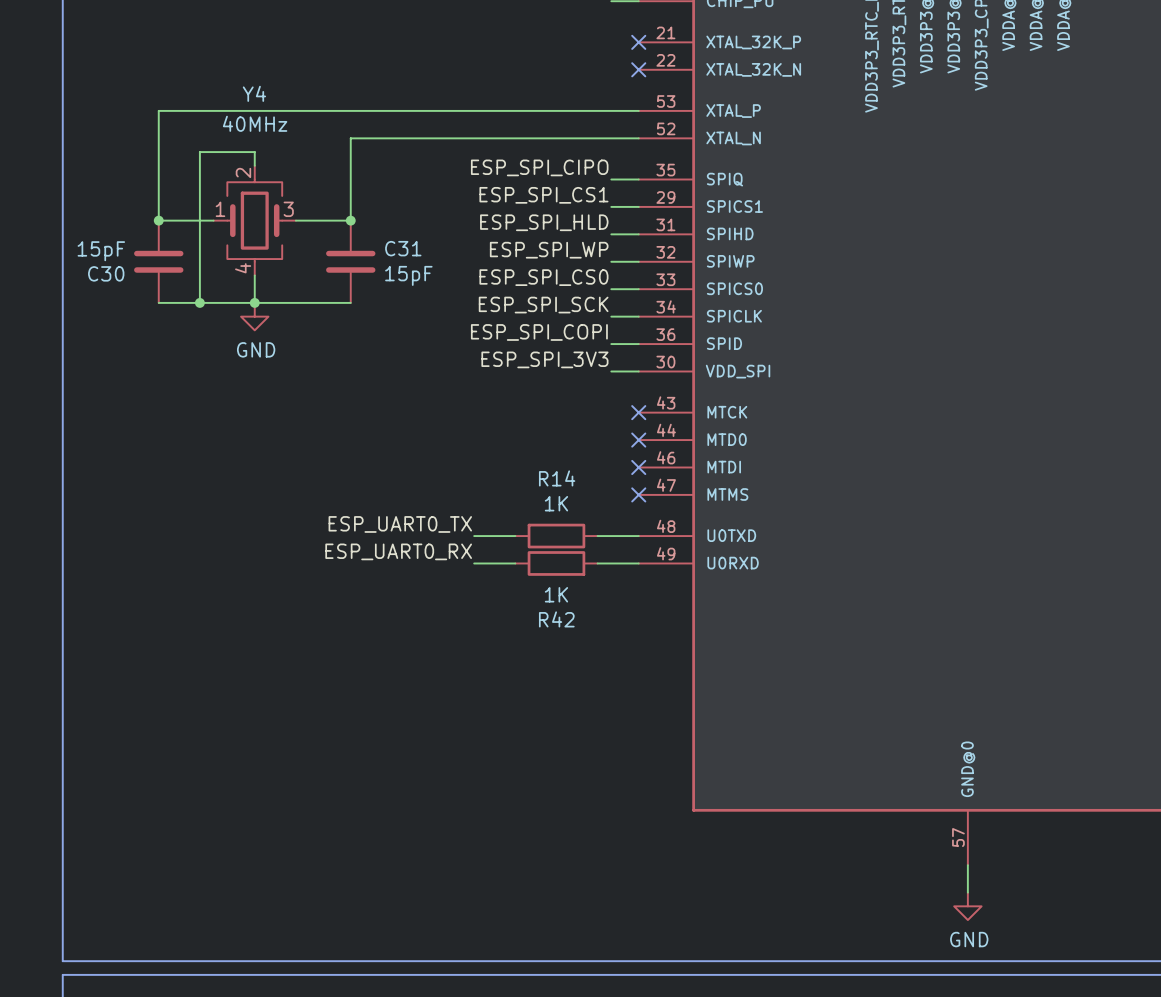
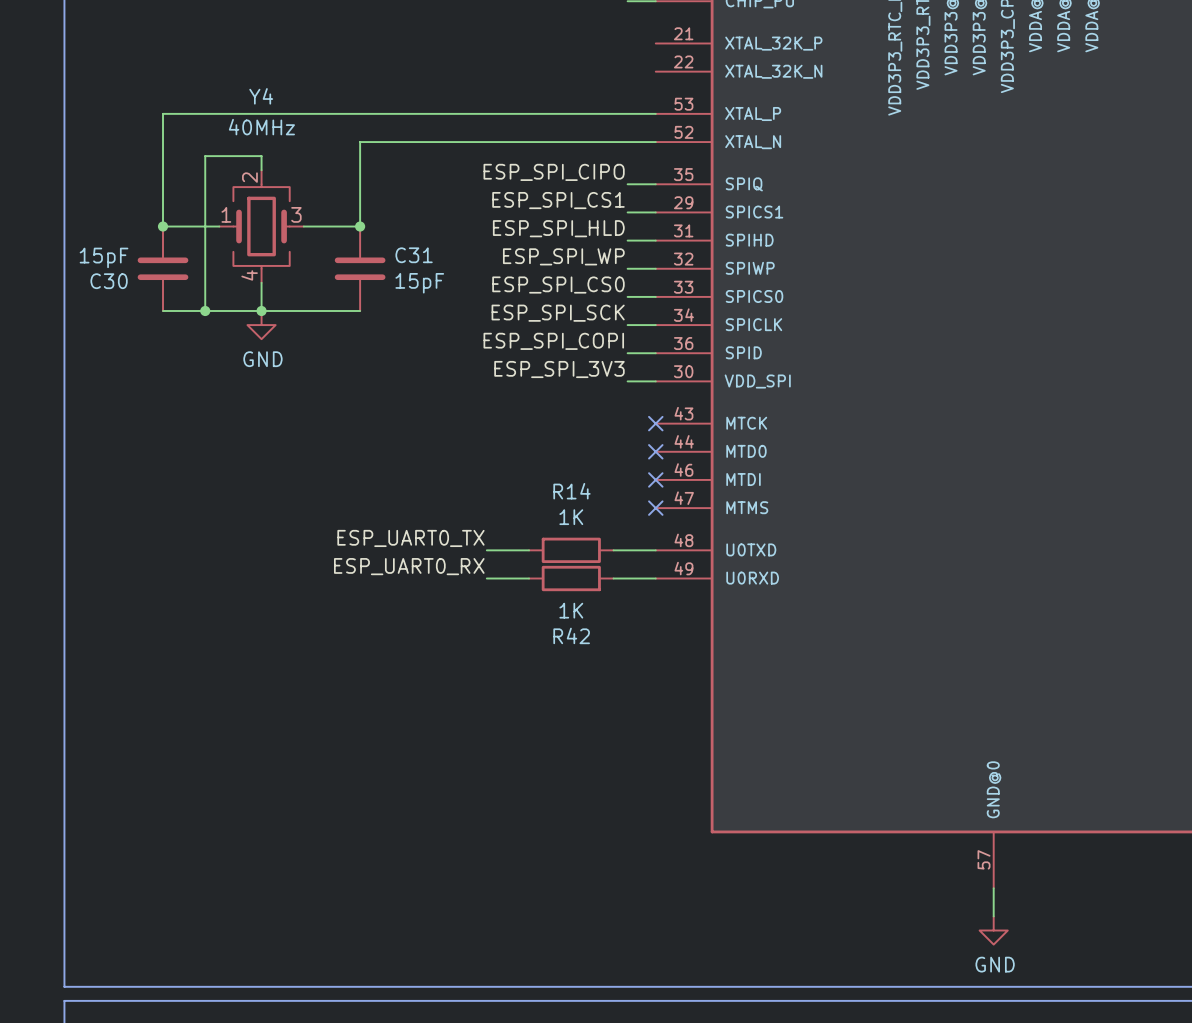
no-connect mark: (638, 42) -> none
no-connect mark: (638, 69) -> none

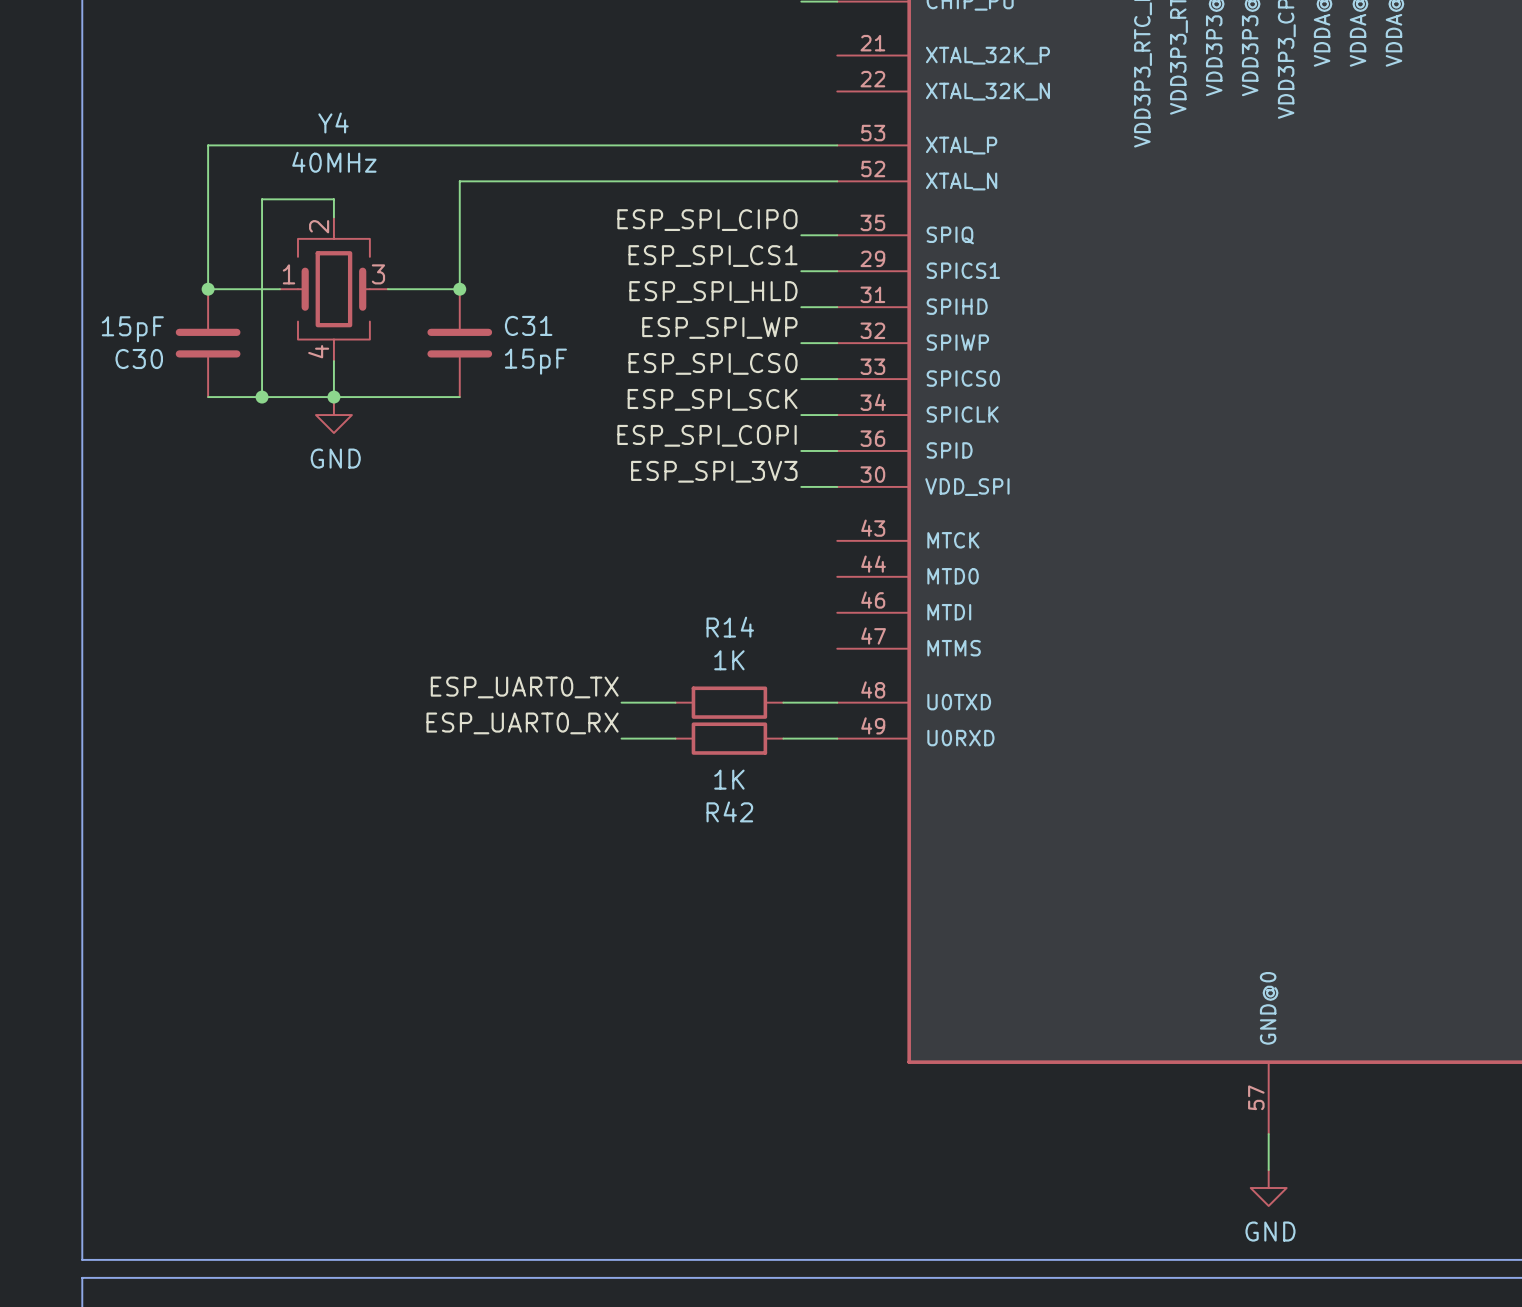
no-connect mark: (655, 423) -> none
no-connect mark: (655, 451) -> none
no-connect mark: (655, 479) -> none
no-connect mark: (655, 508) -> none

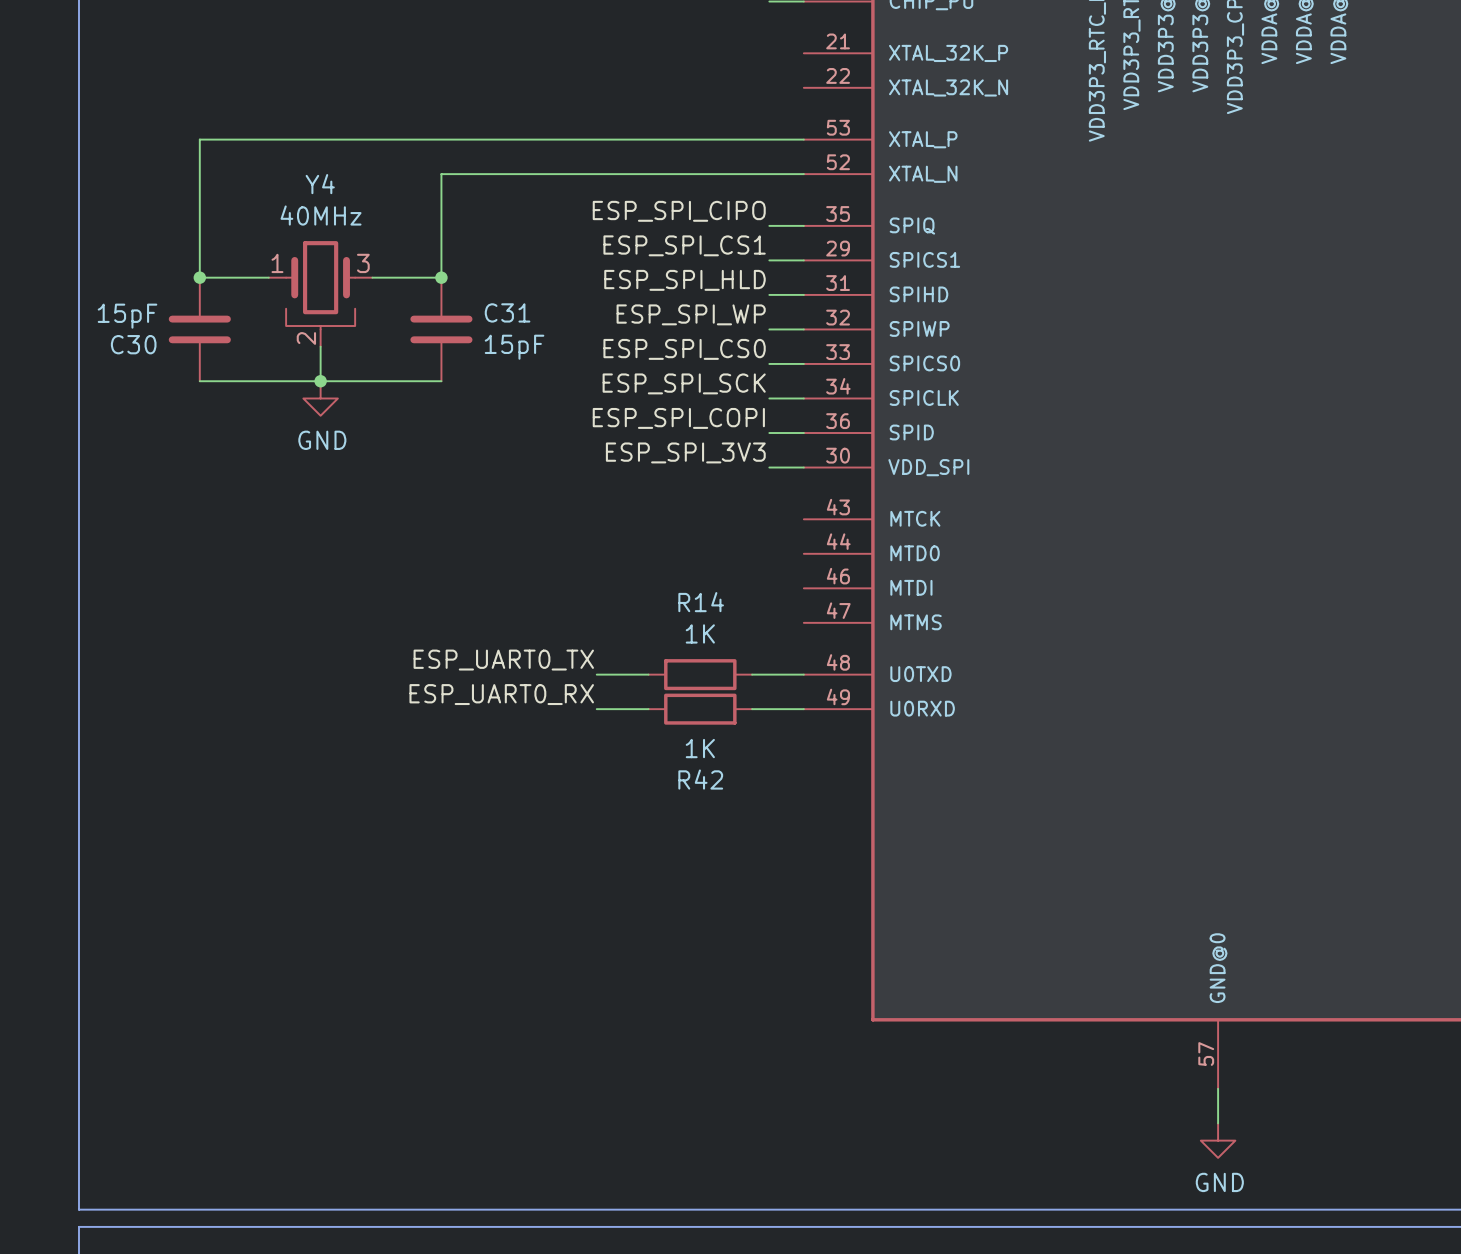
Y4 name position: Y4 (333, 123) -> Y4 (320, 184)
Y4 value position: 40MHz (334, 162) -> 40MHz (321, 215)
Y4 symbol: [280, 217, 388, 362] -> [268, 241, 373, 347]
wire: (333, 217) (333, 199) (262, 199) (262, 397) -> none
junction: (262, 397) -> none

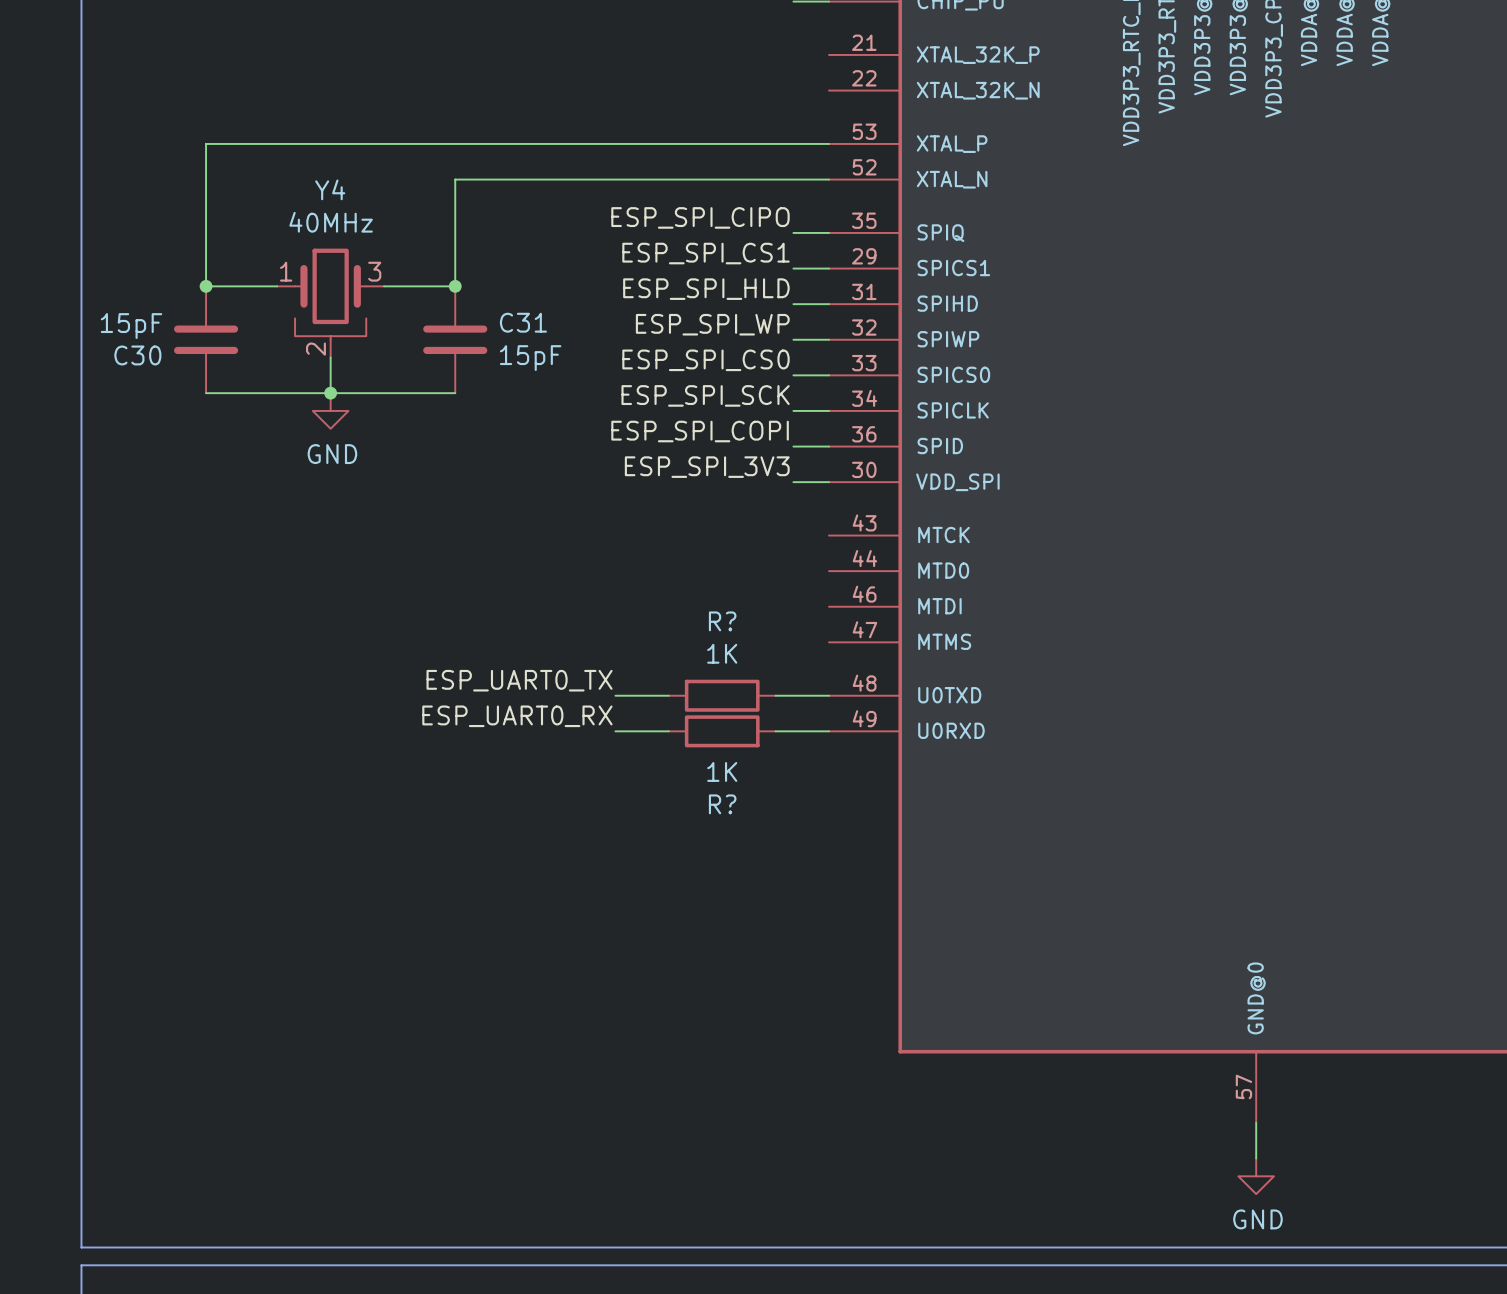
R14 name: R14 (701, 602) -> R? (722, 621)
R42 name: R42 (700, 779) -> R? (722, 804)

